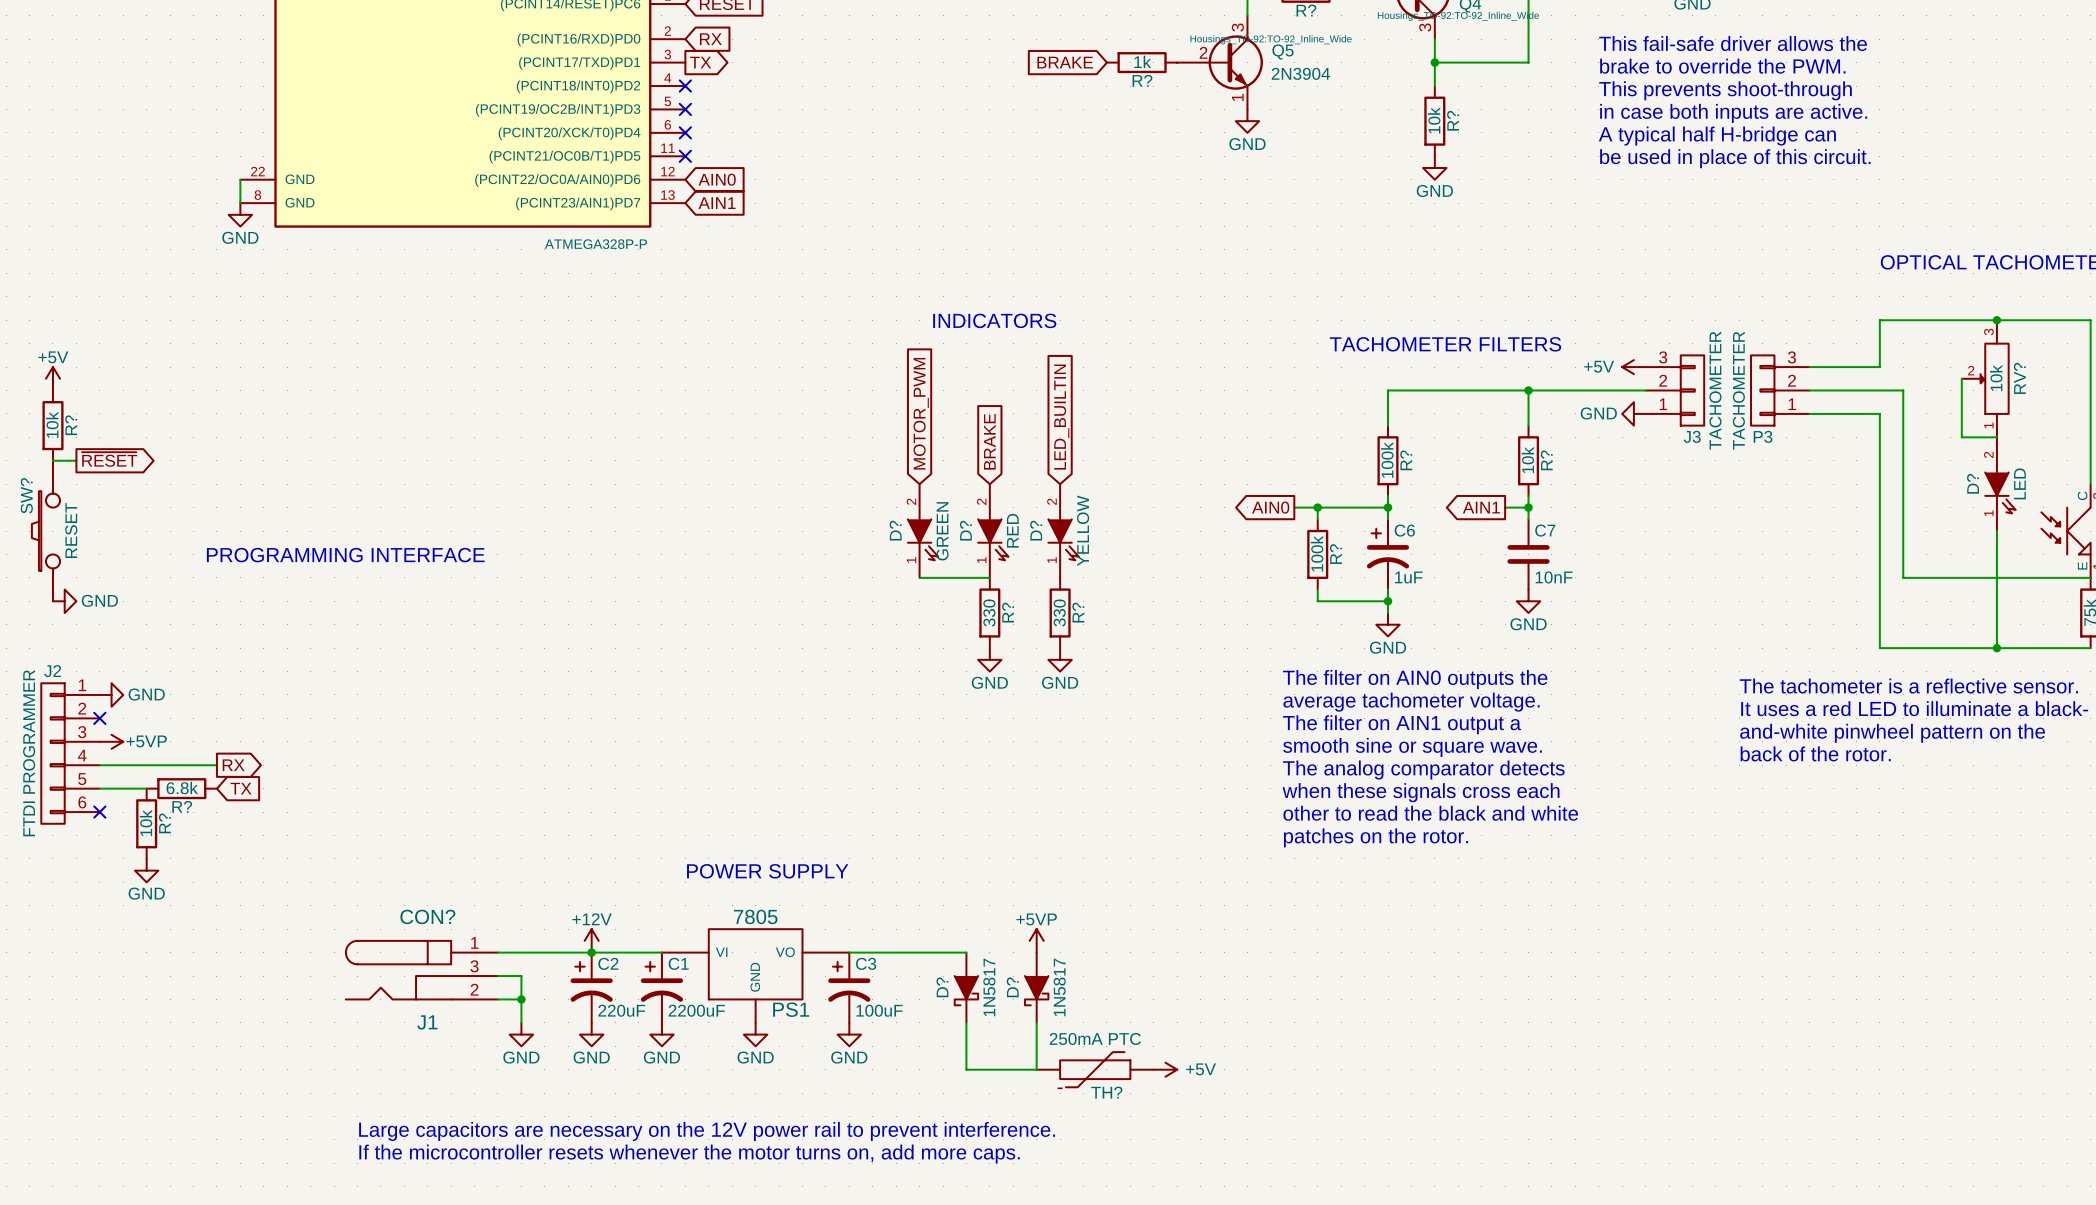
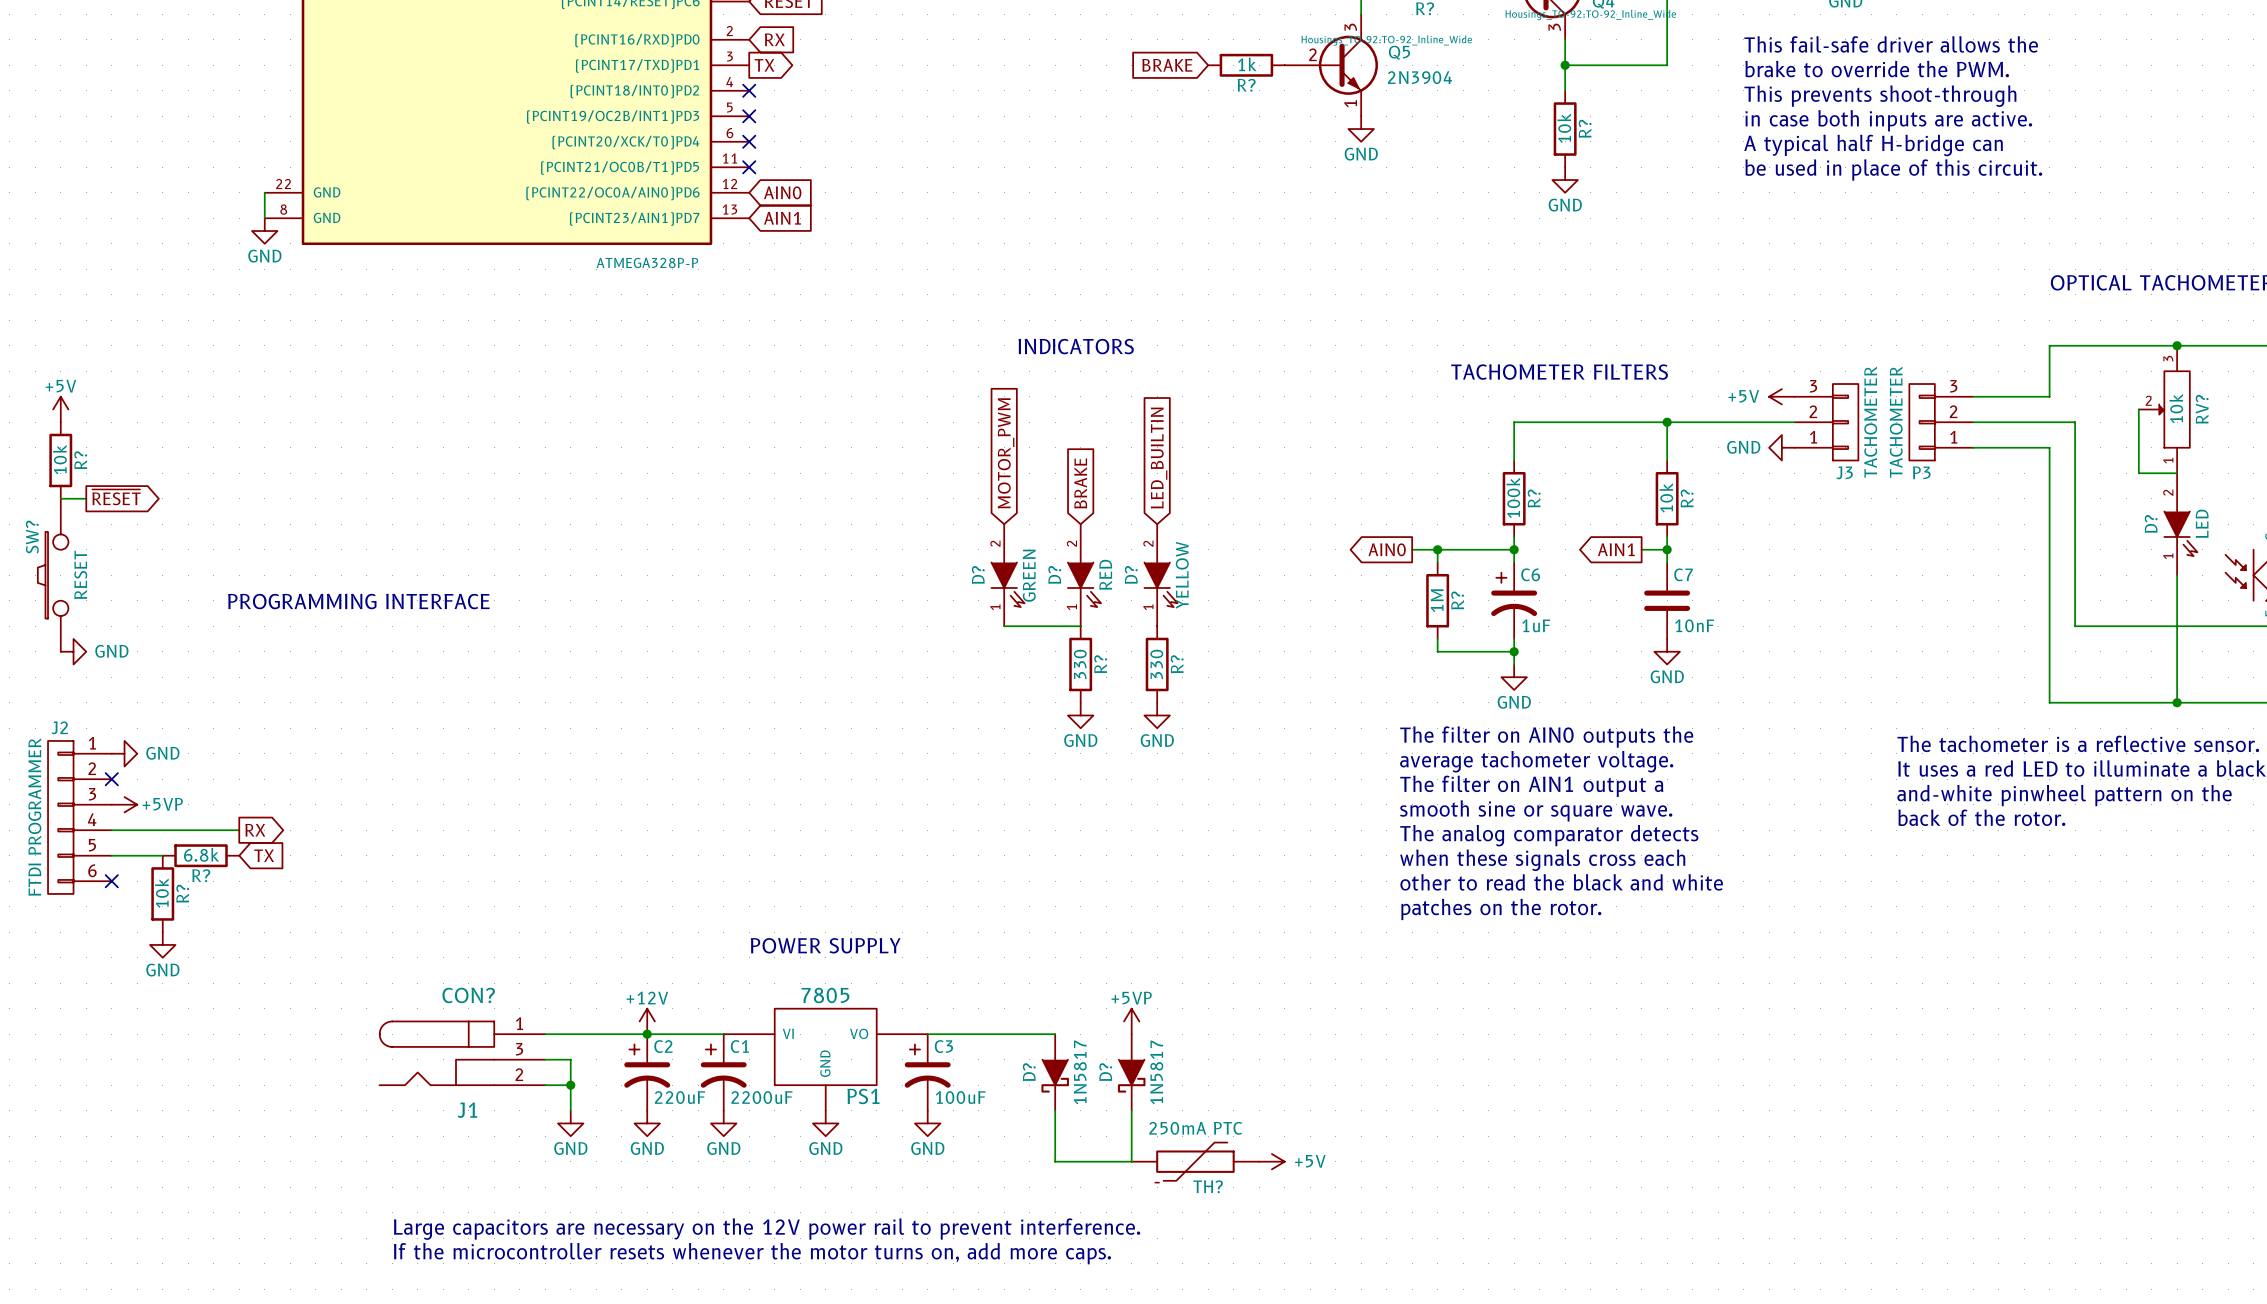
R? value: 100k (1317, 553) -> 1M (1437, 600)

